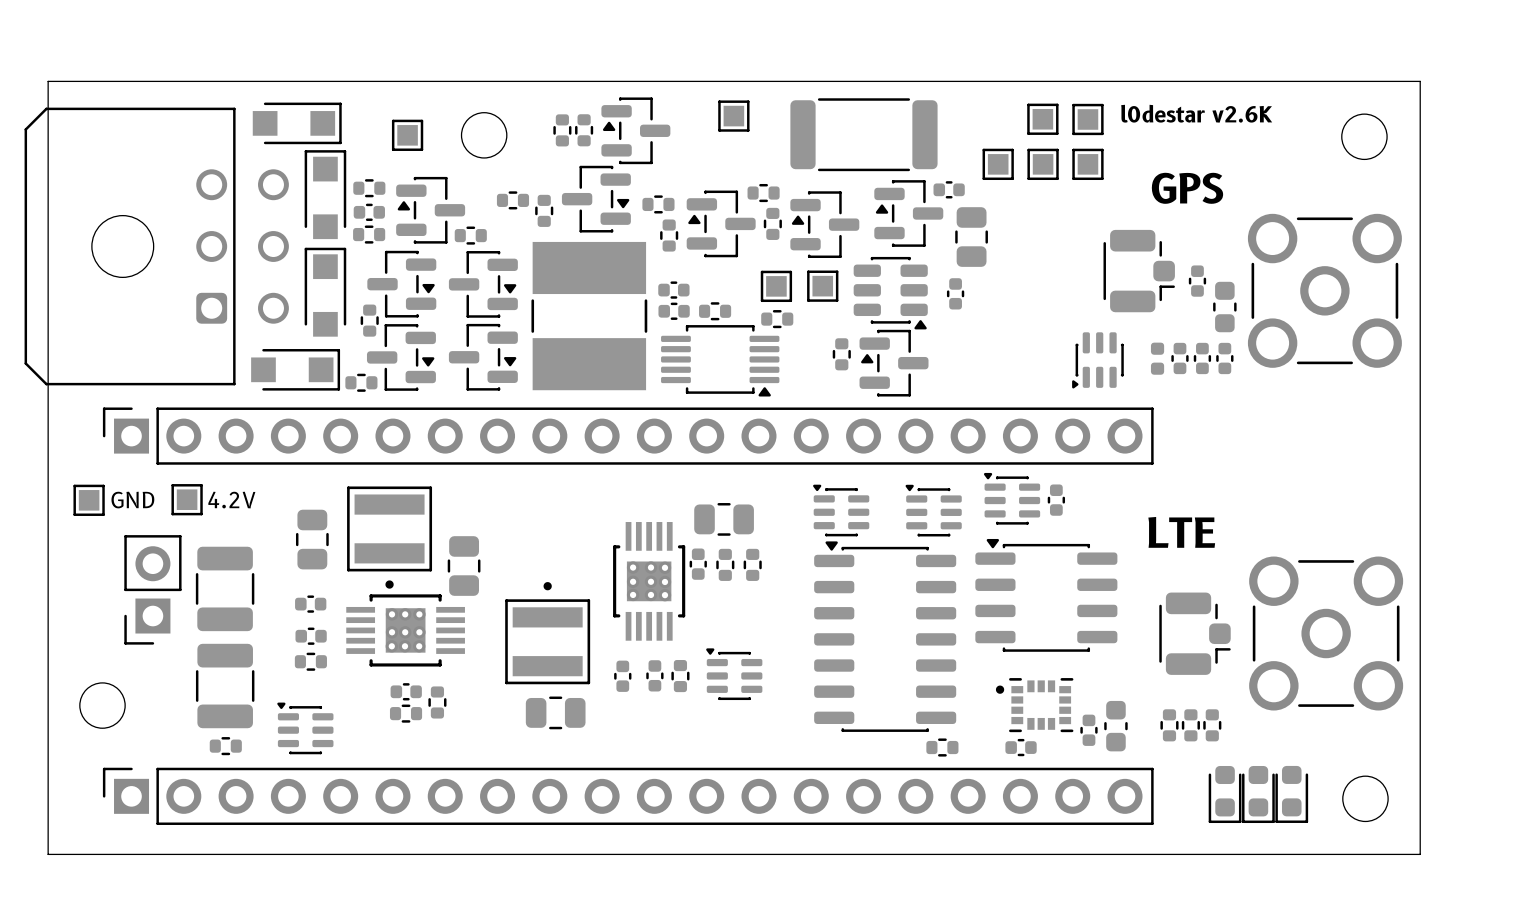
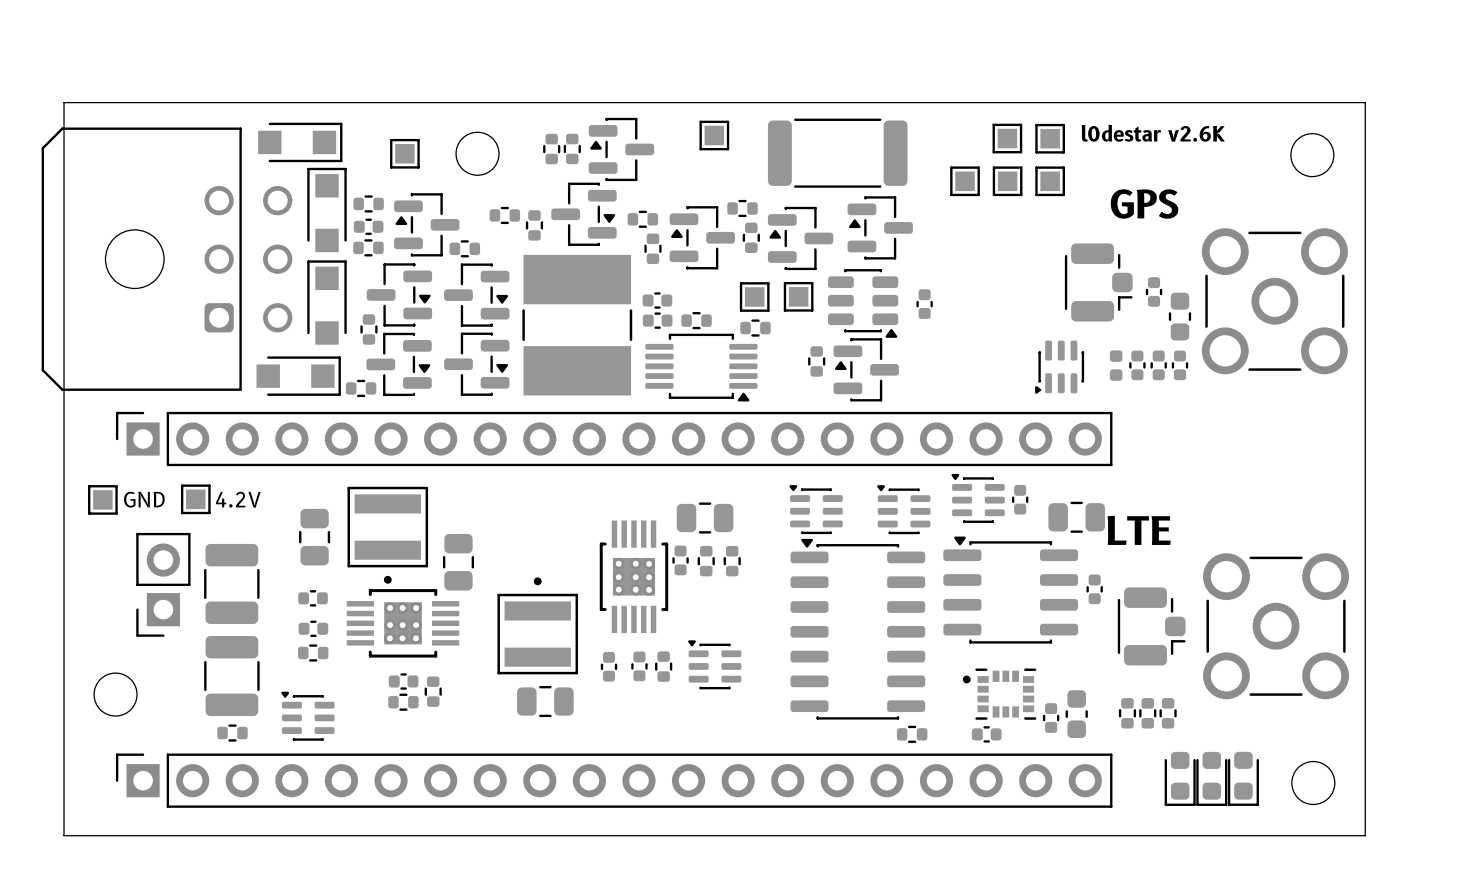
part rotation: 0° (949, 189) -> 90° clockwise (1094, 589)
part position: (949, 189) -> (1094, 589)
part rotation: 0° (971, 237) -> 90° clockwise (1076, 517)
part position: (971, 237) -> (1076, 517)

